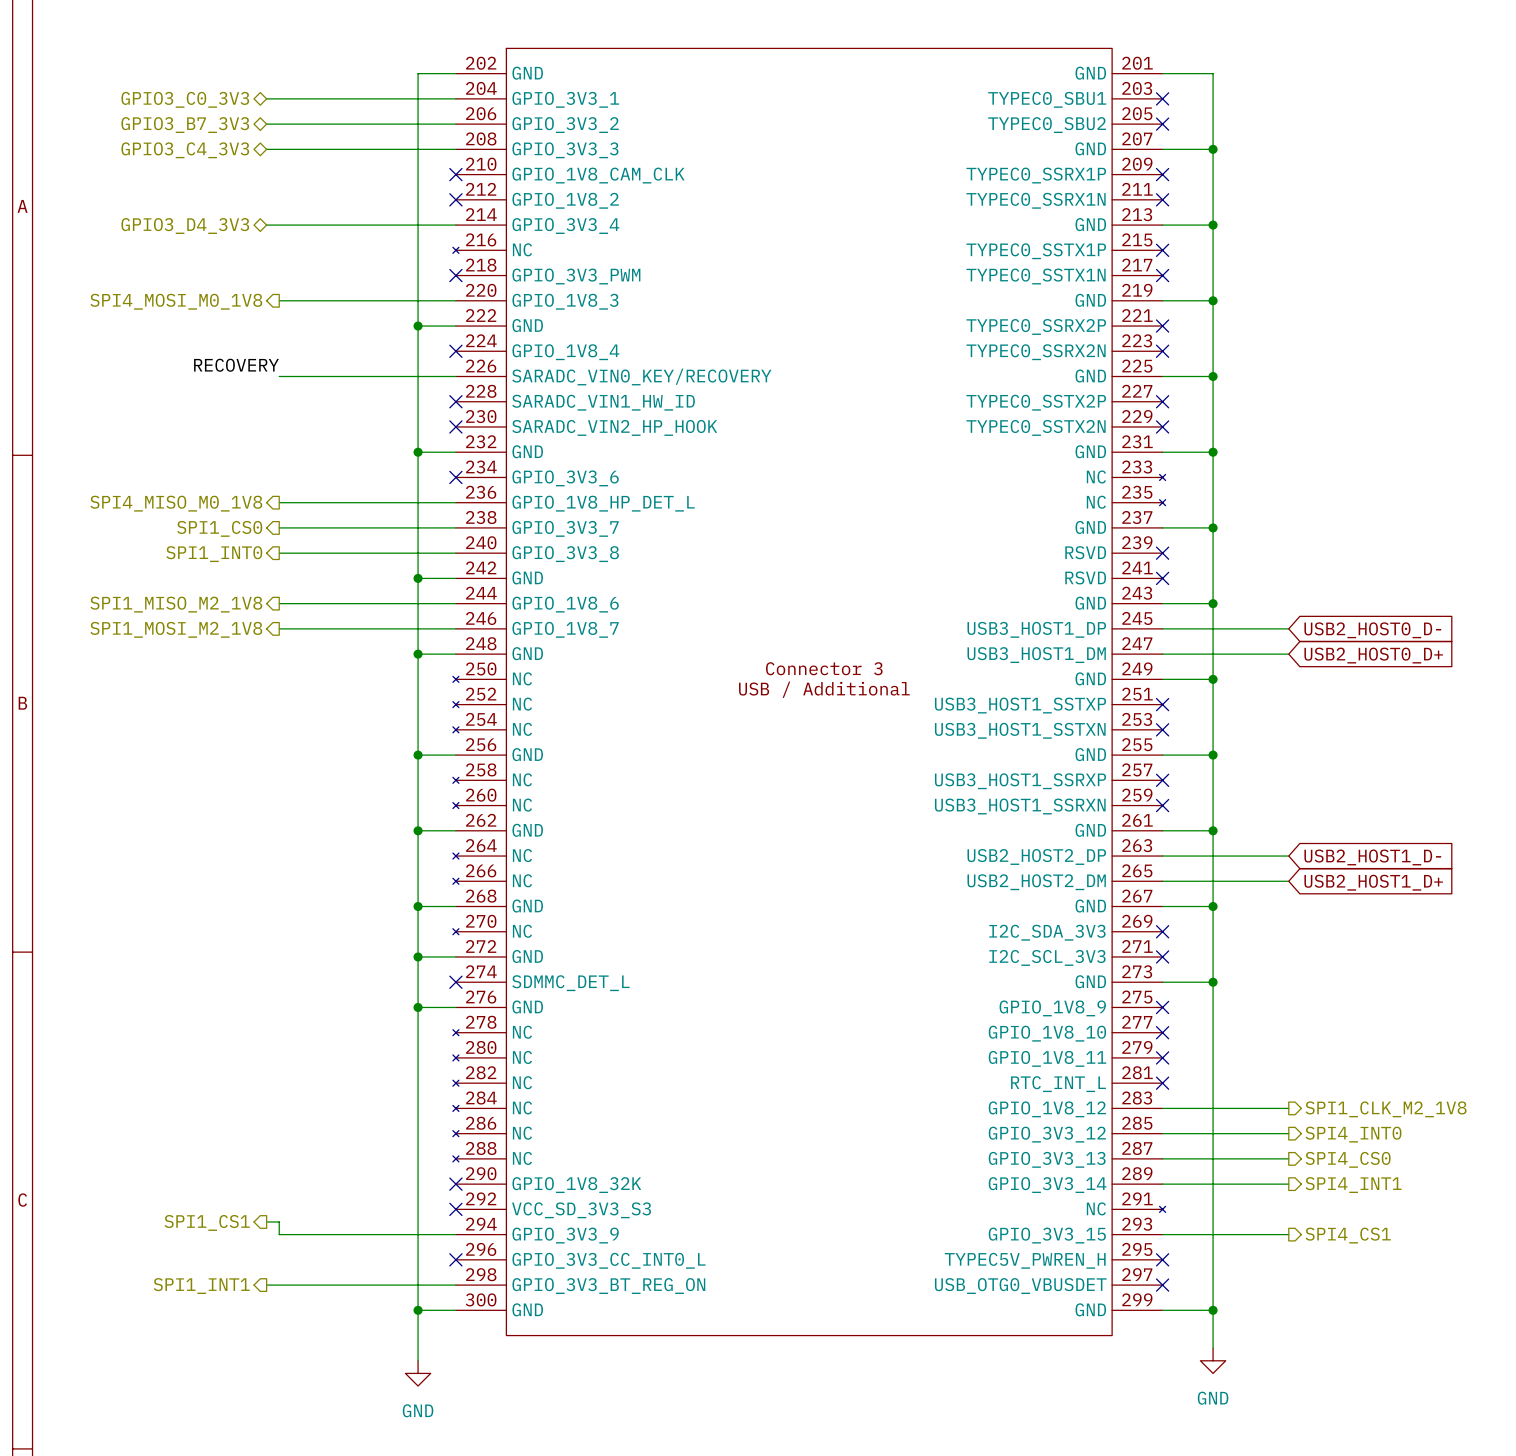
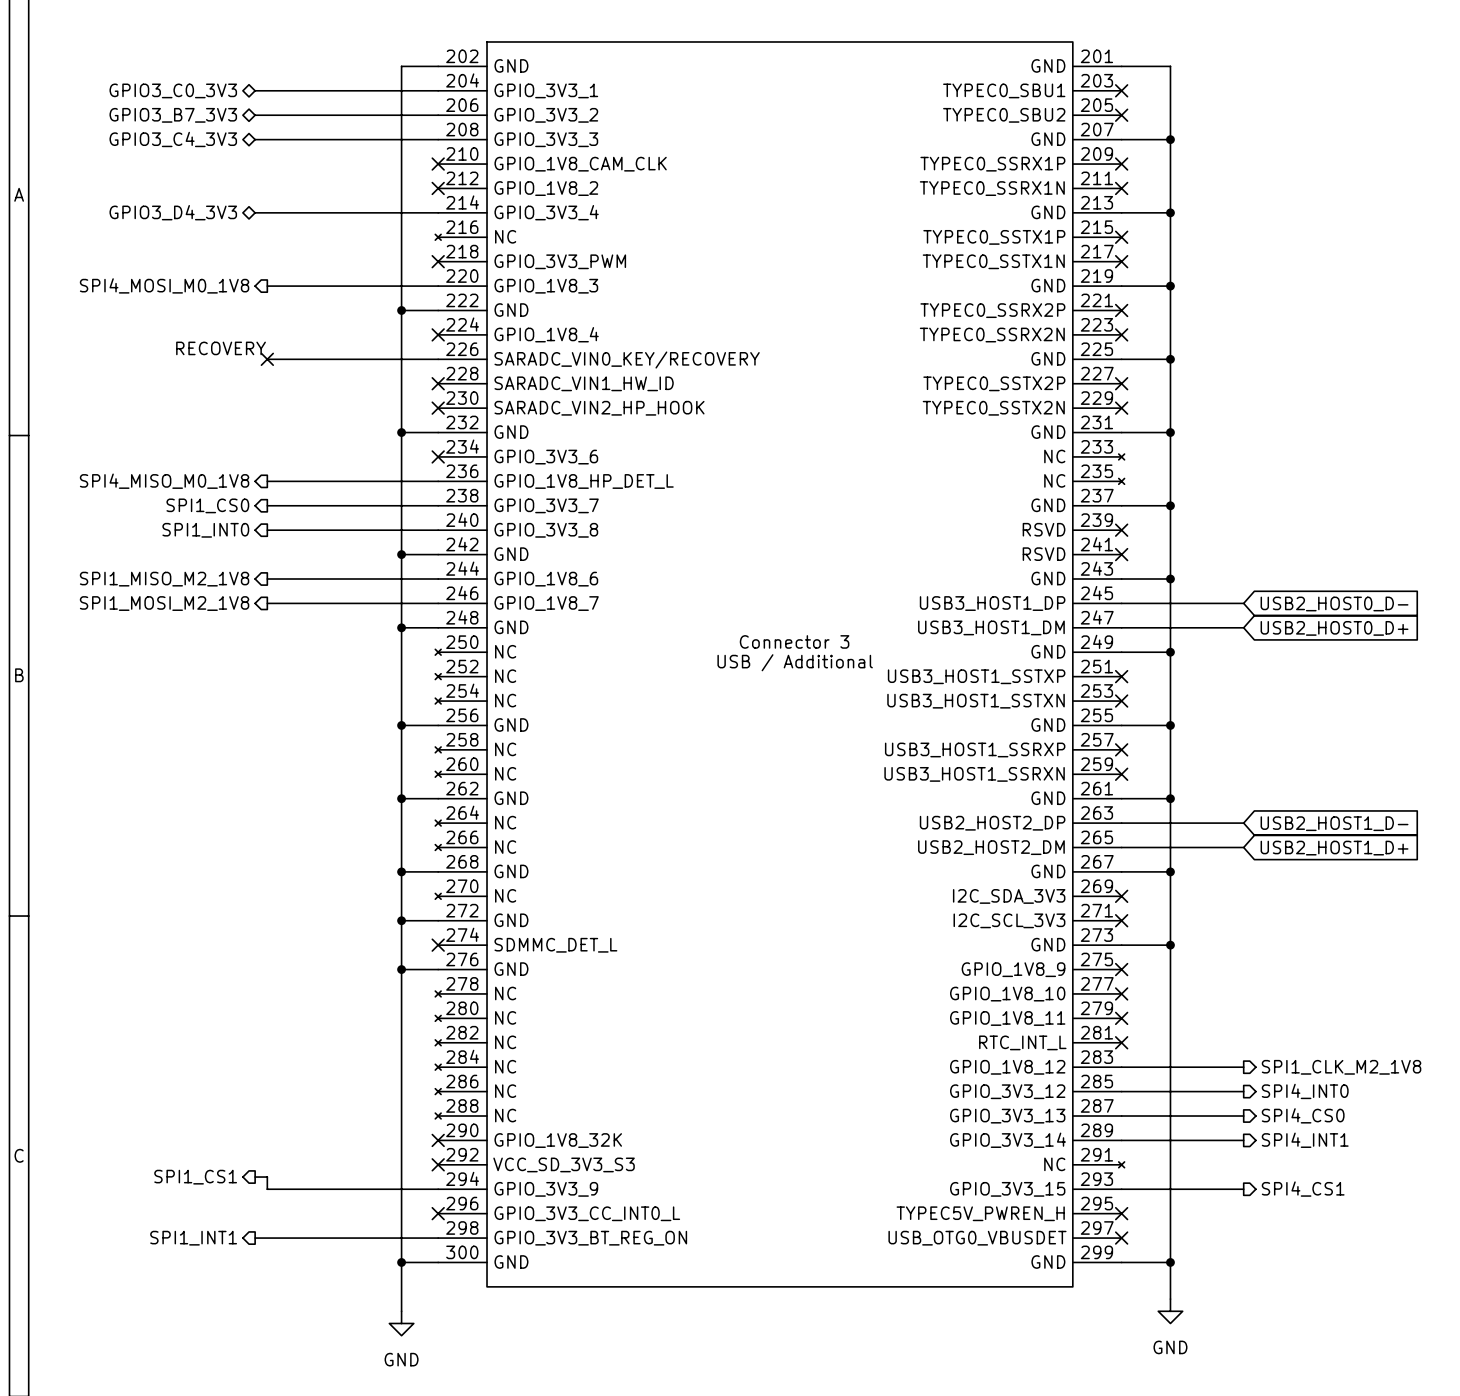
no-connect mark: none -> (267, 359)

